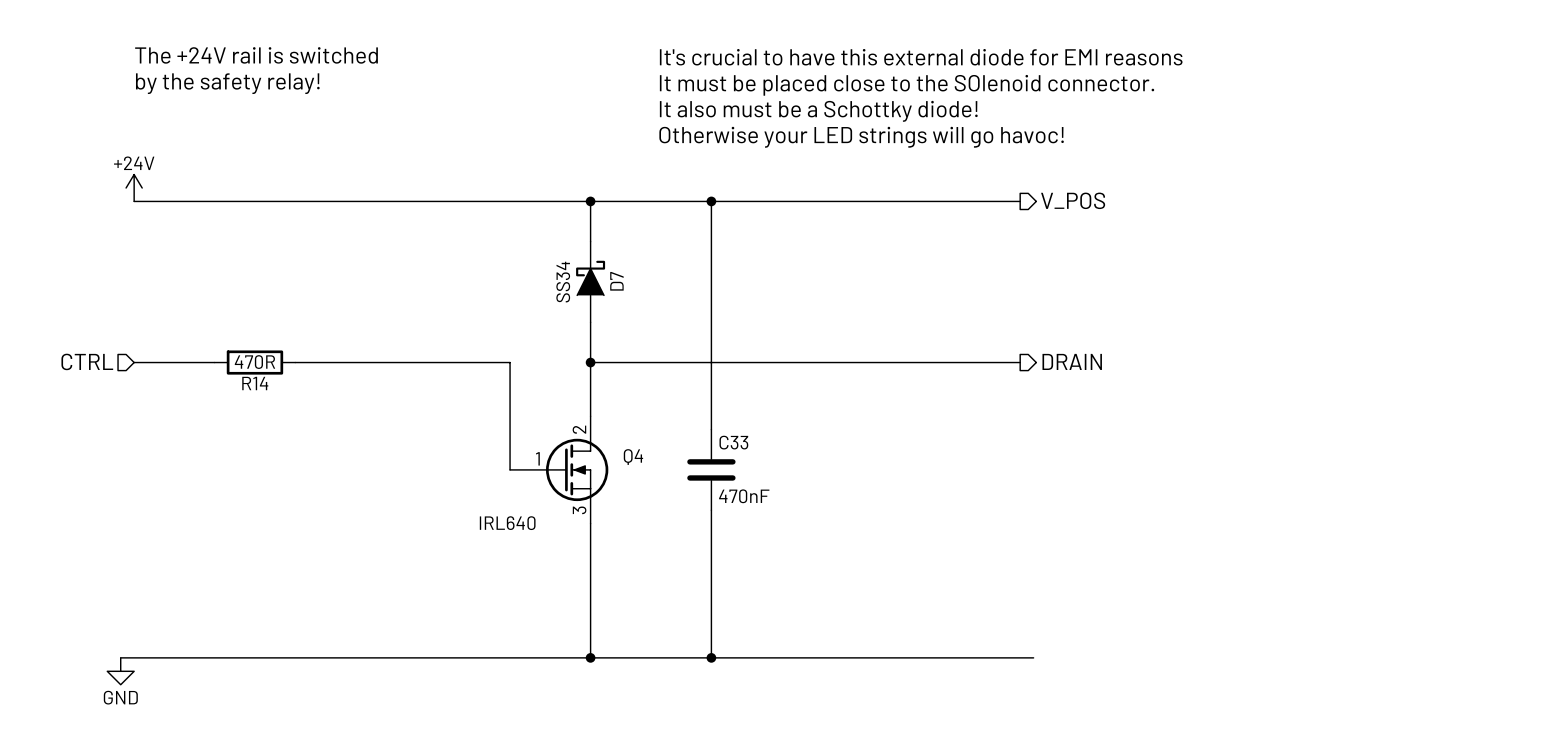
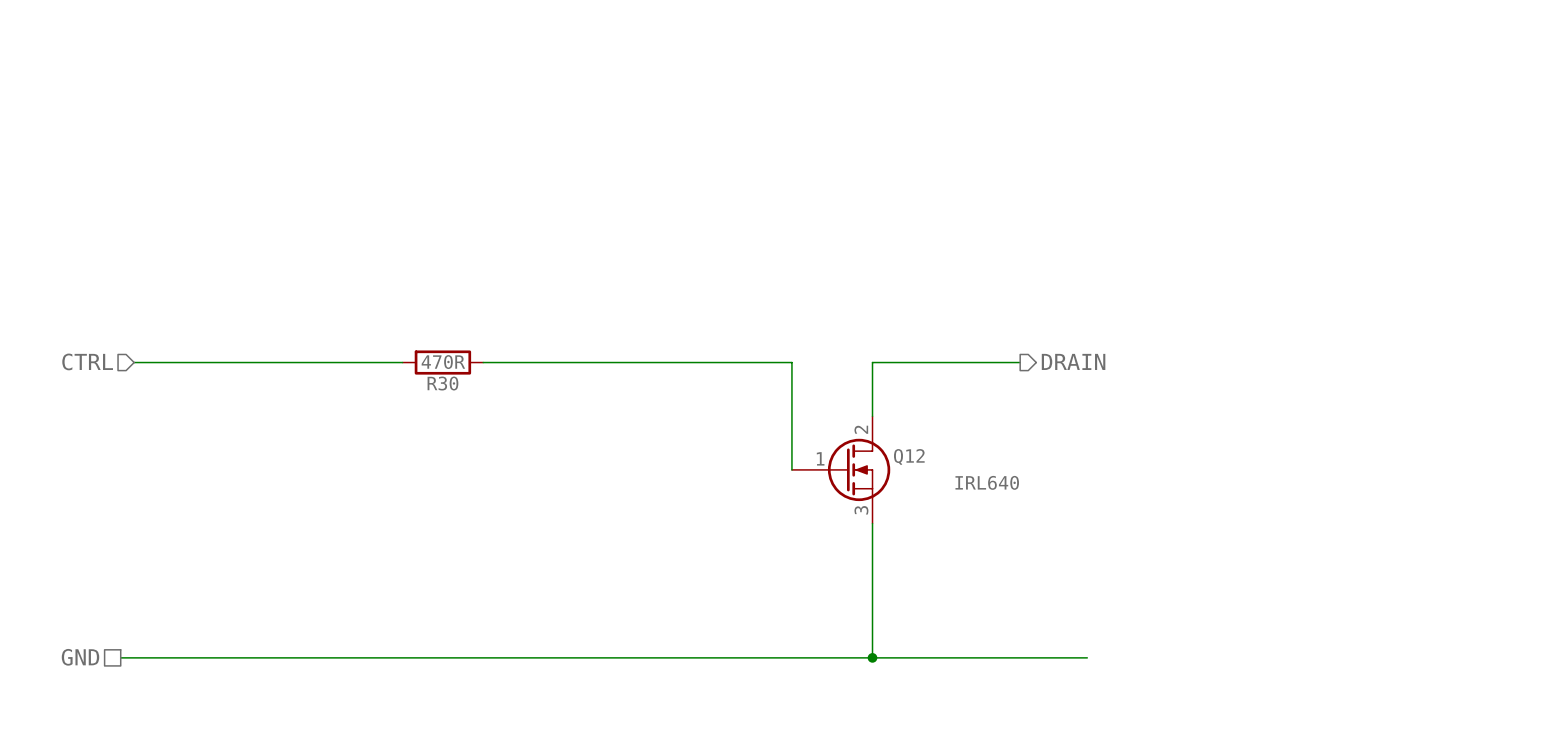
text: The +24V rail is switched (256, 55) -> none
text: It's crucial to have this external diode for EMI reasons (921, 57) -> none
text: by the safety relay! (227, 83) -> none
text: It must be placed close to the SOlenoid connector. (907, 85) -> none
text: It also must be a Schottky diode! (818, 111) -> none
text: Otherwise your LED strings will go havoc! (861, 137) -> none
power symbol: +24V (134, 188) -> none
hierarchical label: V_POS (1073, 200) -> none
wire: (134, 201) (1020, 201) -> none
wire: (590, 201) (590, 241) -> none
junction: (590, 201) -> none
wire: (711, 201) (711, 429) -> none
junction: (711, 201) -> none
D7: SS34 (590, 281) -> none
wire: (590, 322) (590, 416) -> none
R14: 470R (254, 362) -> none
R30: none -> 470R (442, 362)
wire: (510, 362) (510, 469) -> (510, 362) (590, 362)
junction: (590, 362) -> none
wire: (791, 362) (872, 362) -> (872, 416) (872, 362)
wire: none -> (791, 362) (791, 469)
Q4: IRL640 (559, 469) -> none
C33: 470nF (711, 469) -> none
Q12: none -> IRL640 (841, 469)
wire: (711, 510) (711, 657) -> none
wire: (590, 523) (590, 657) -> none
wire: none -> (872, 523) (872, 657)
hierarchical label: none -> GND (80, 657)
junction: (590, 657) -> none
junction: (711, 657) -> none
junction: none -> (872, 657)
wire: none -> (1033, 657) (1087, 657)
power symbol: GND (120, 671) -> none

